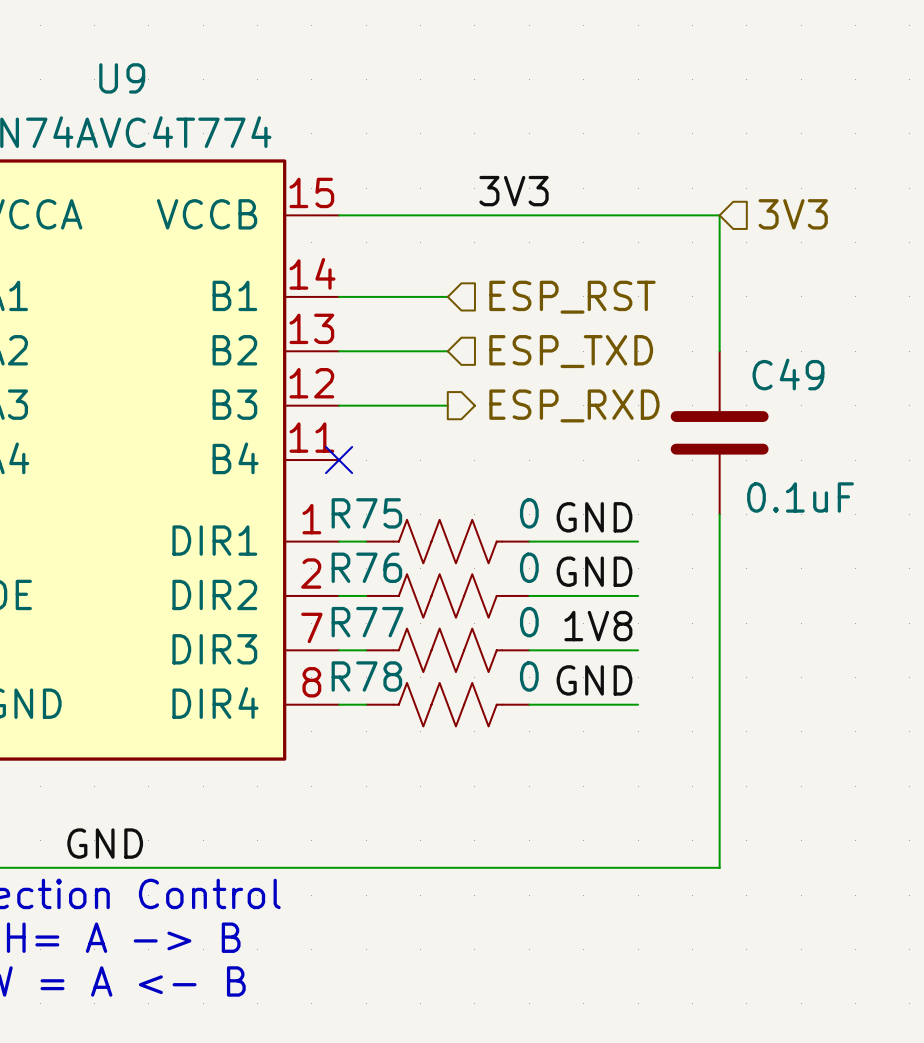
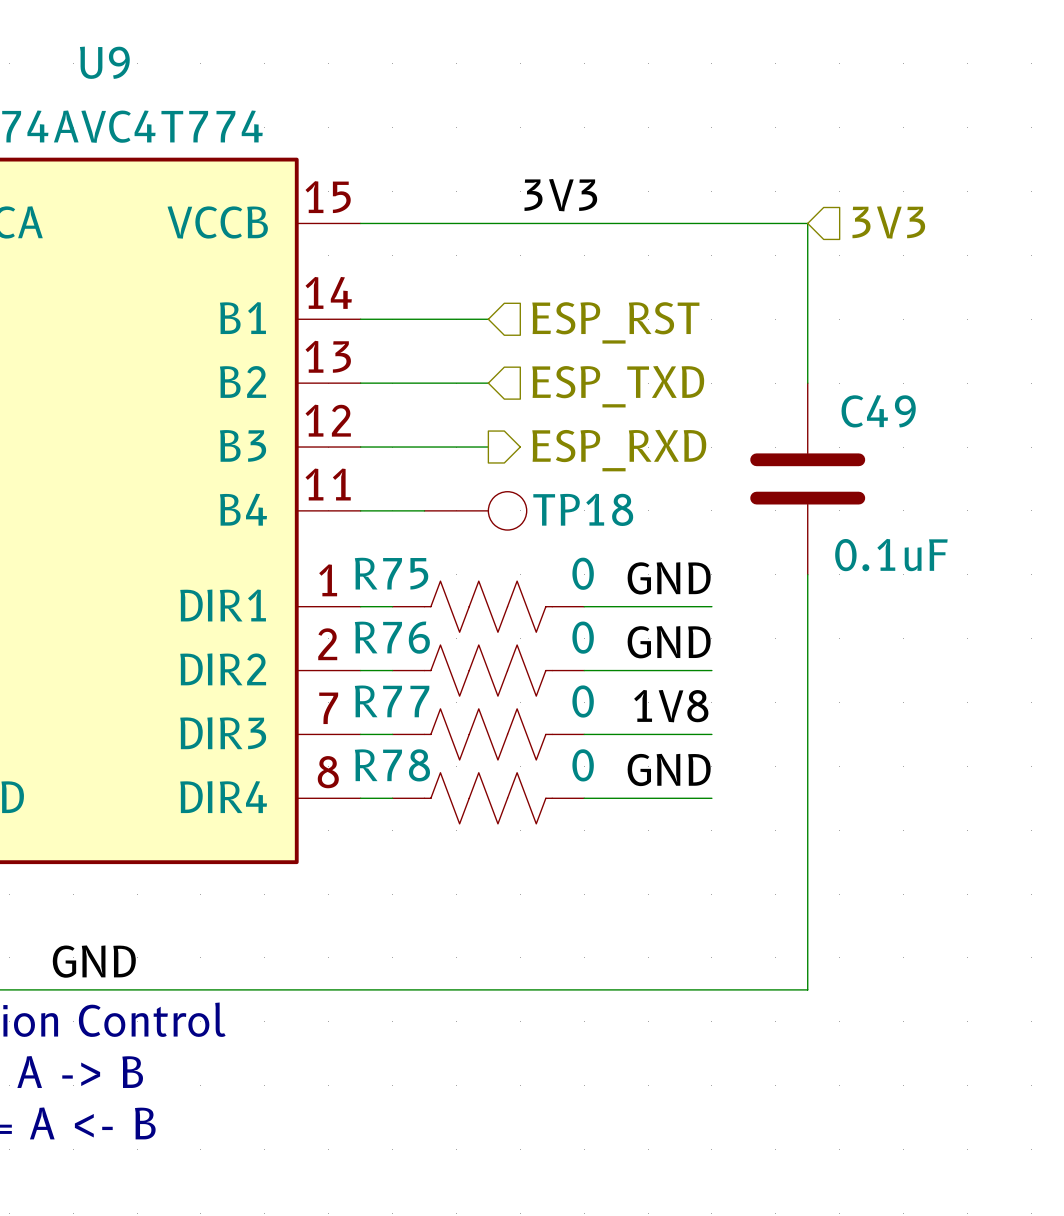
wire: none -> (360, 510) (424, 510)
no-connect mark: (339, 460) -> none
TP18: none -> (475, 510)

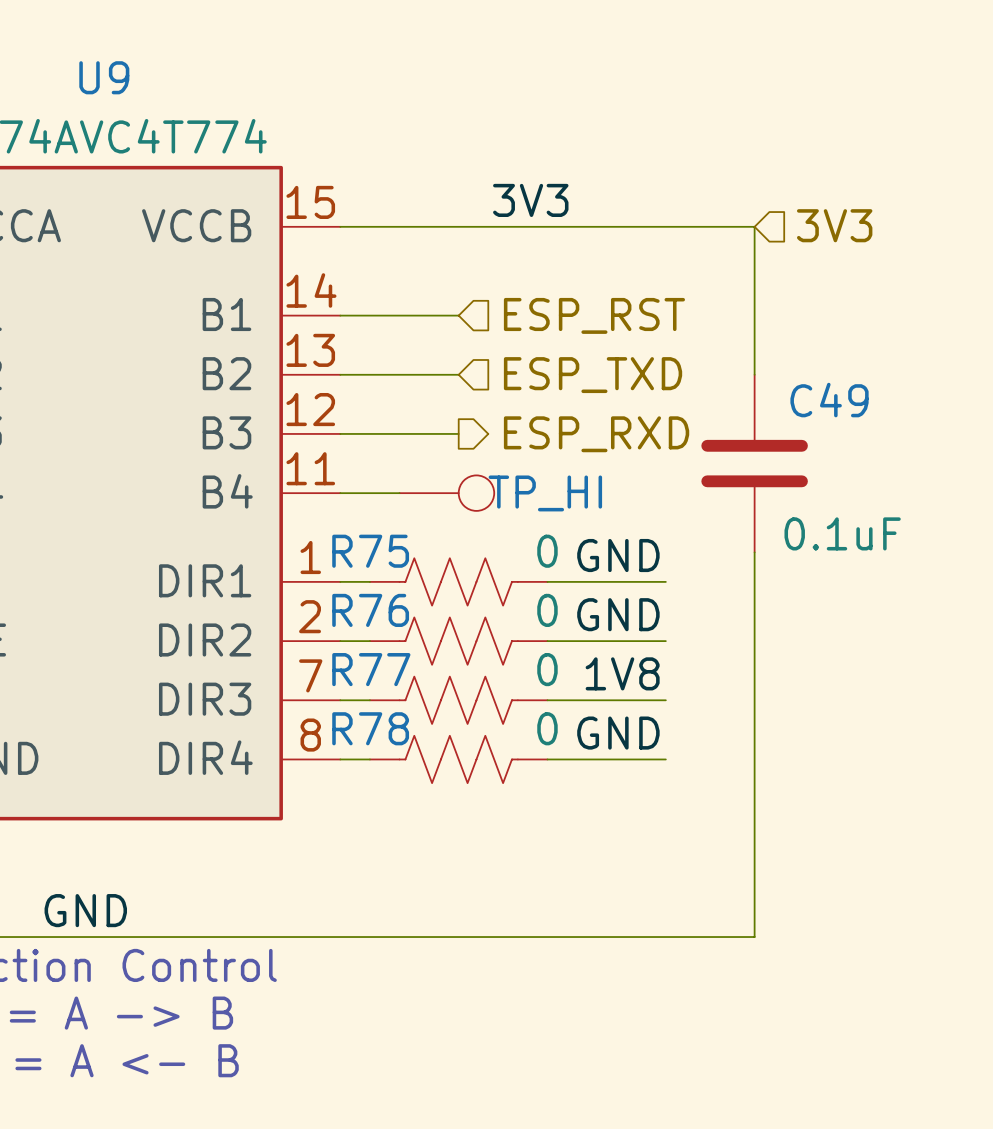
TP18 name: TP18 (583, 509) -> TP_HI (545, 493)

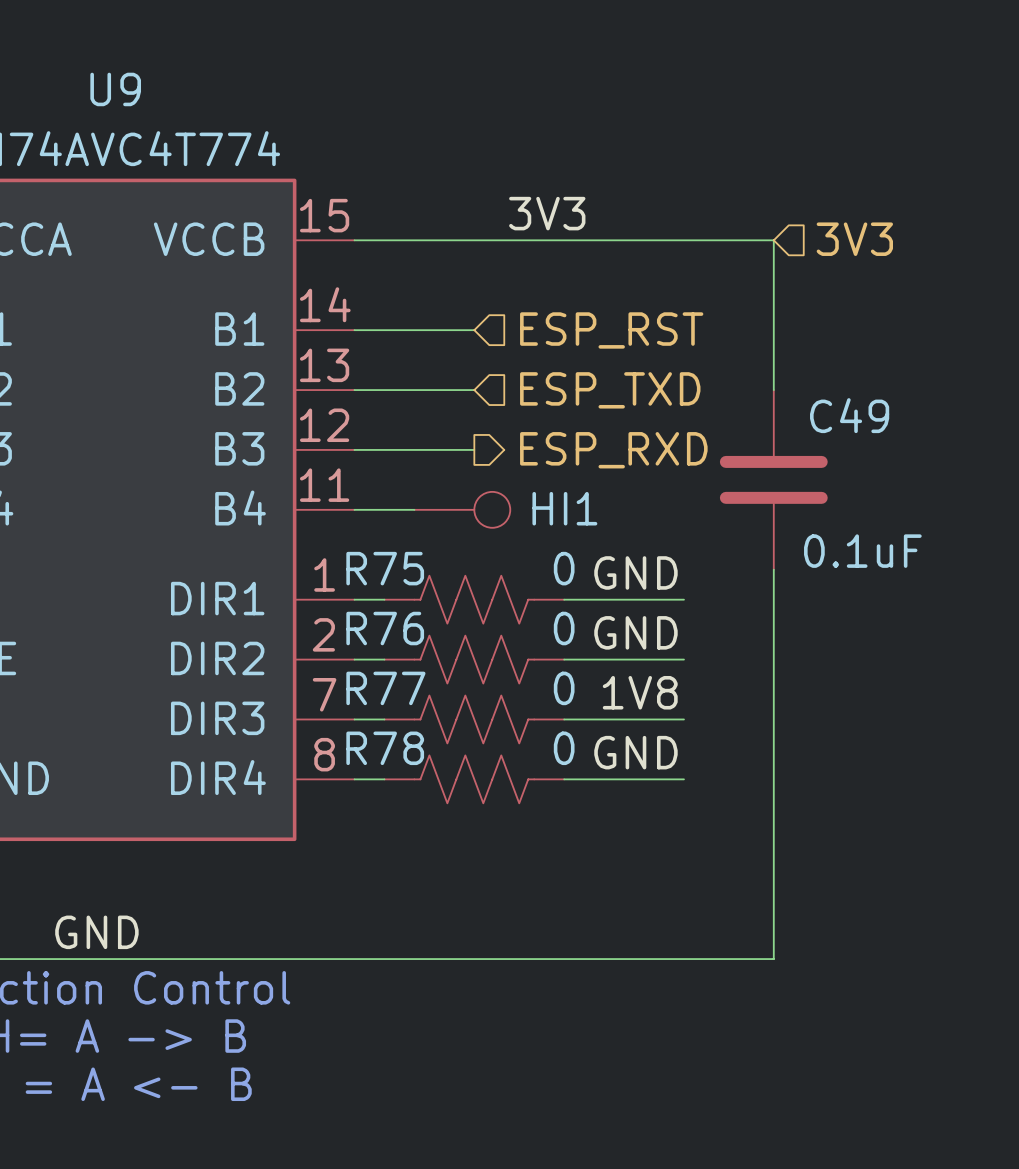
TP_HI name: TP_HI (545, 493) -> HI1 (564, 508)

